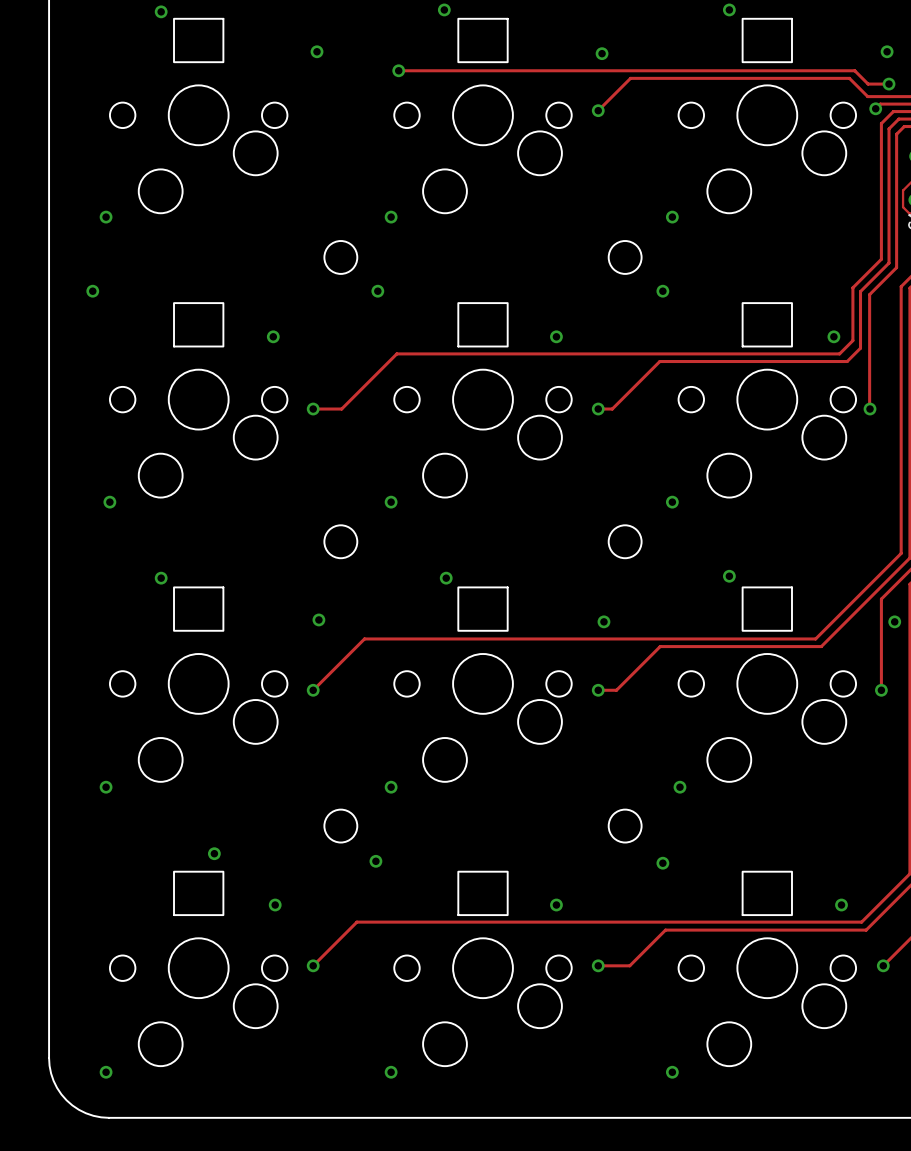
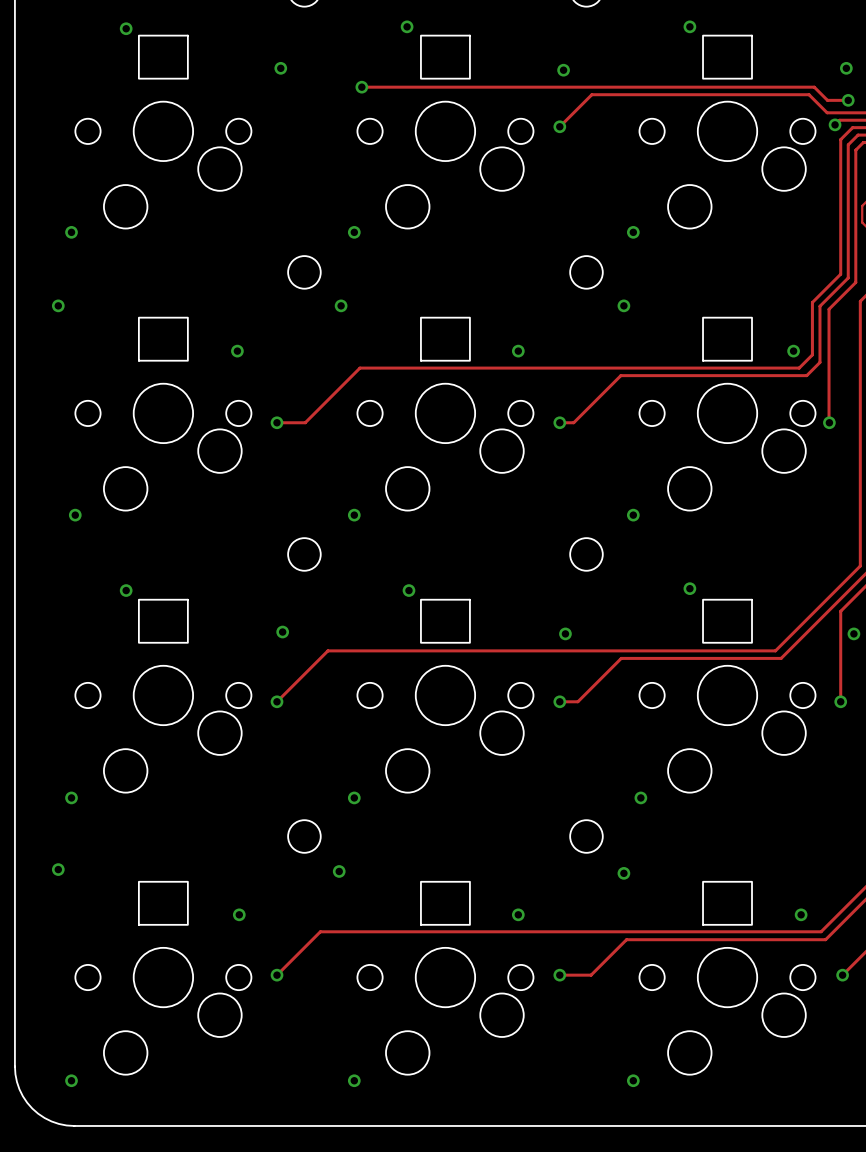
via: (214, 853) -> none
via: none -> (58, 869)

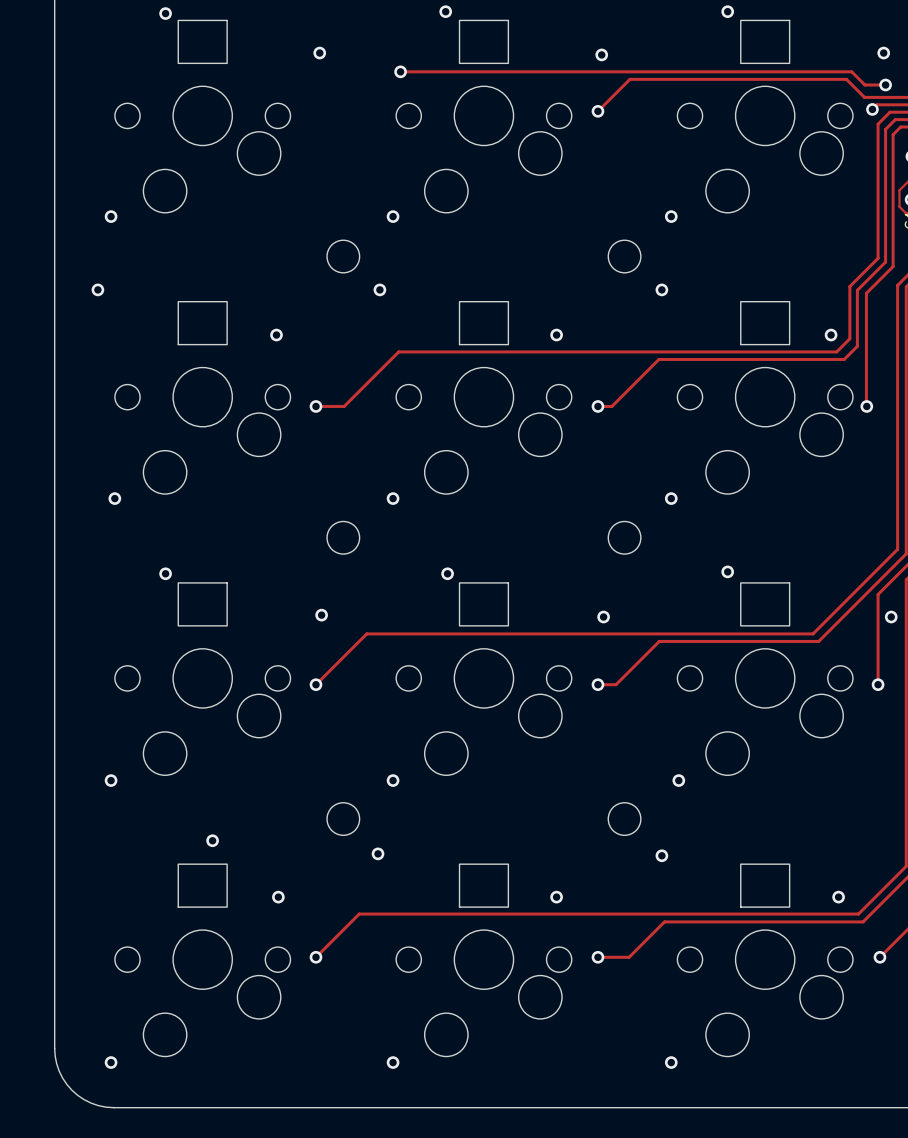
via: none -> (212, 840)
via: (58, 869) -> none

